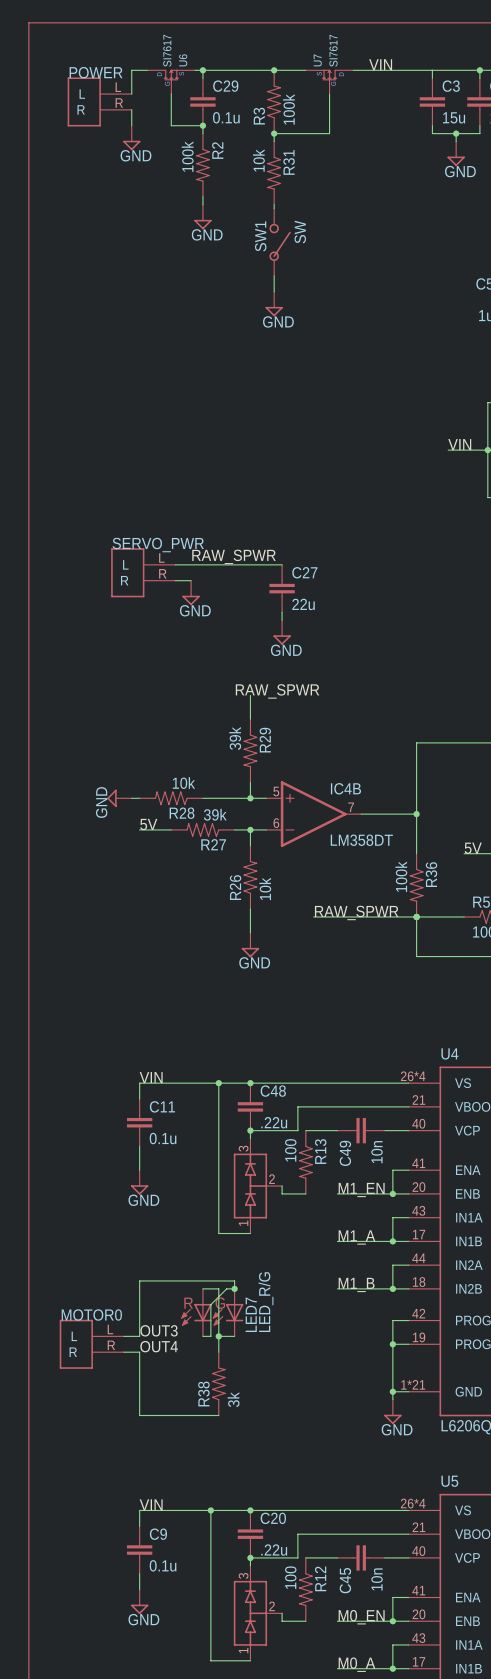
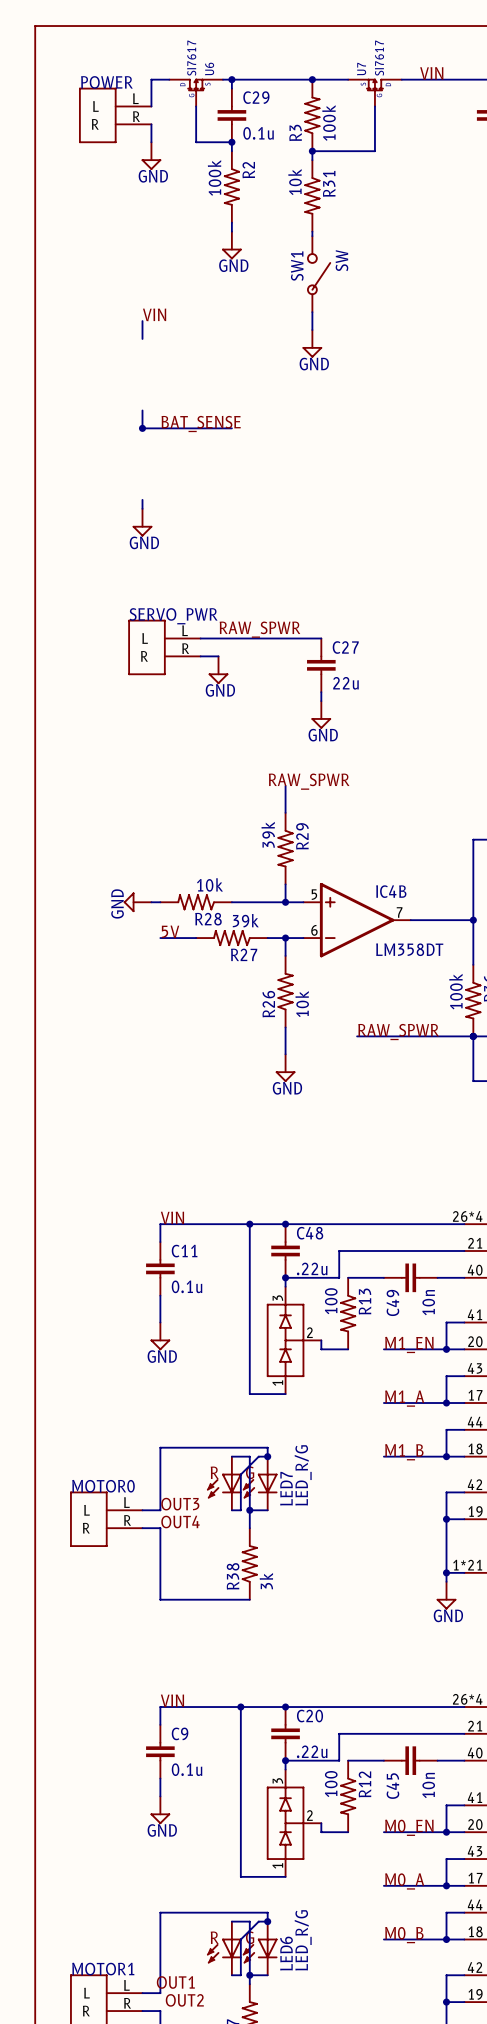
label: none -> VIN (154, 314)
wire: none -> (142, 321) (142, 338)
wire: none -> (142, 410) (142, 428) (231, 428)
label: none -> BAT_SENSE (201, 423)
junction: none -> (142, 428)
wire: none -> (142, 499) (142, 508)
power symbol: none -> GND (142, 522)

